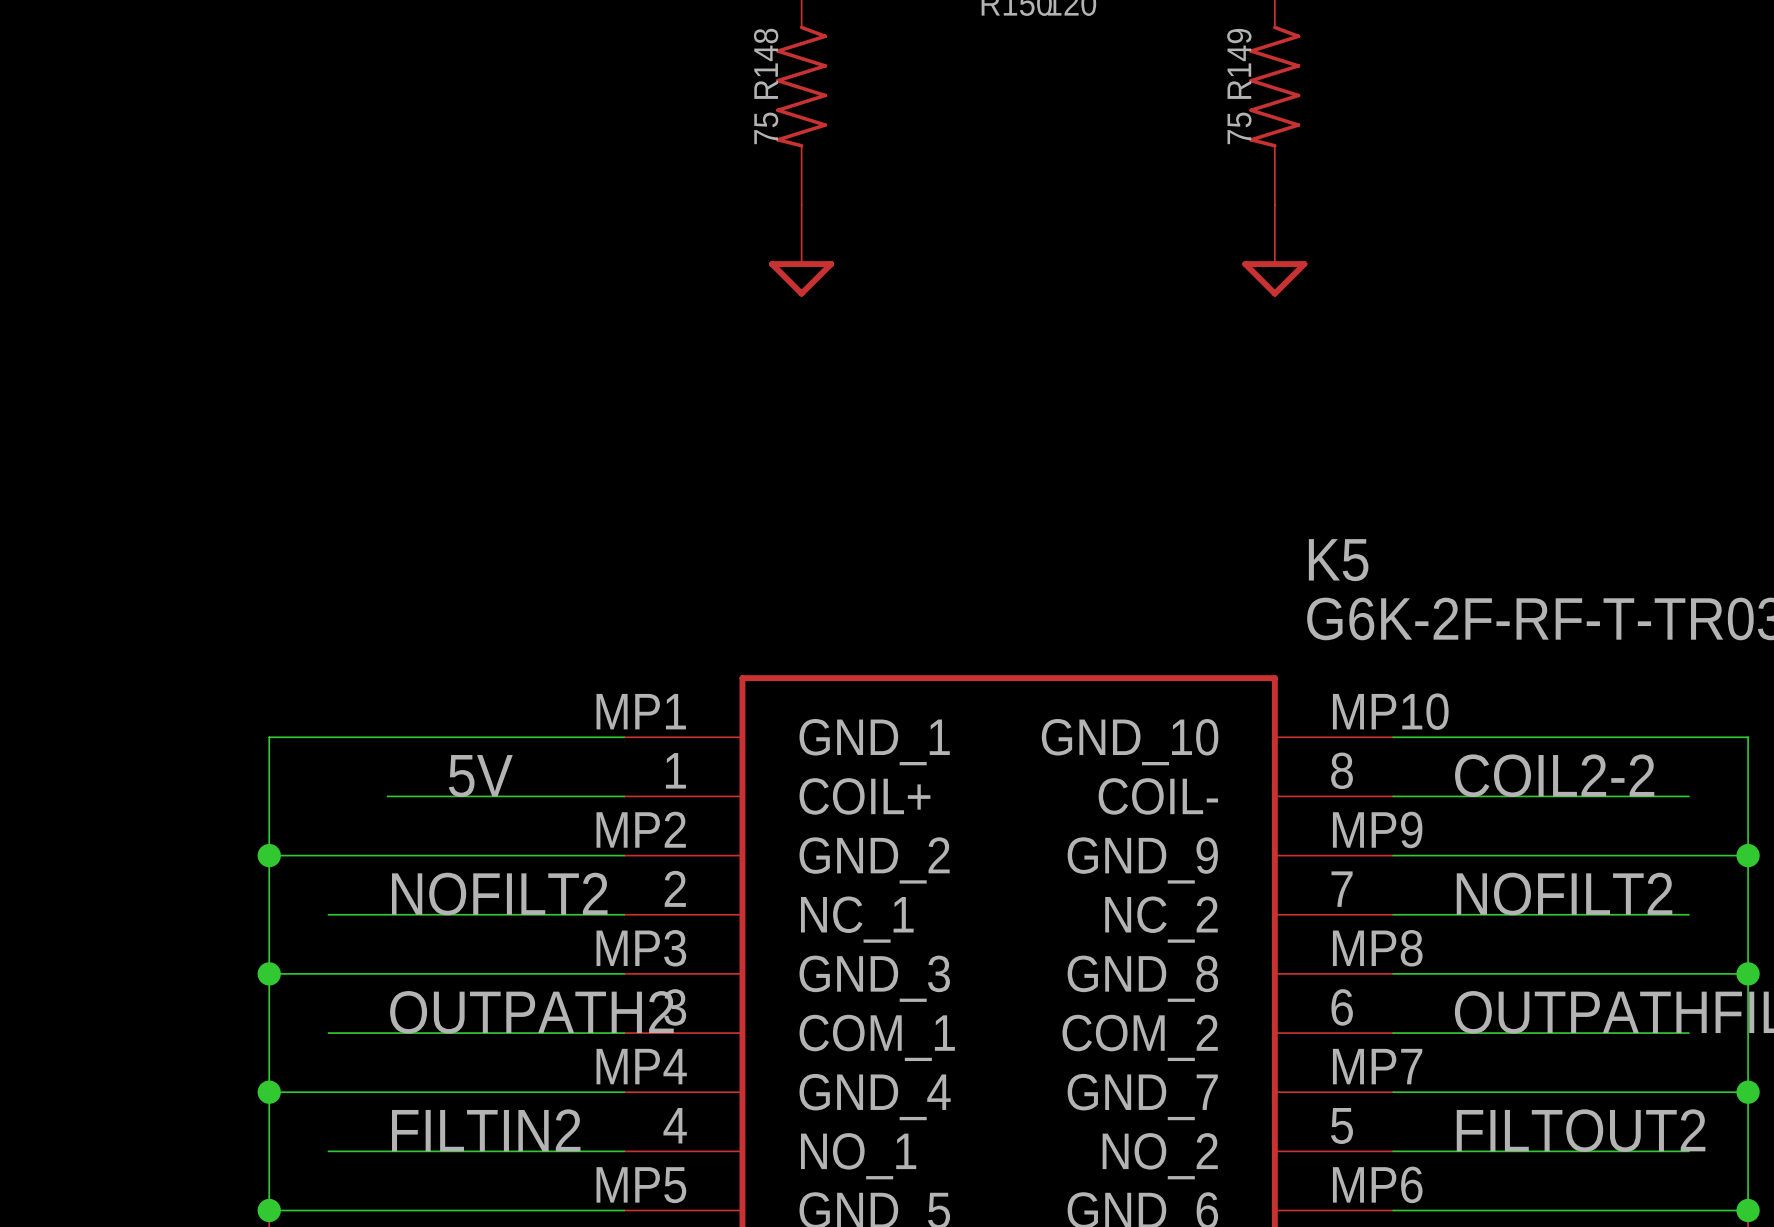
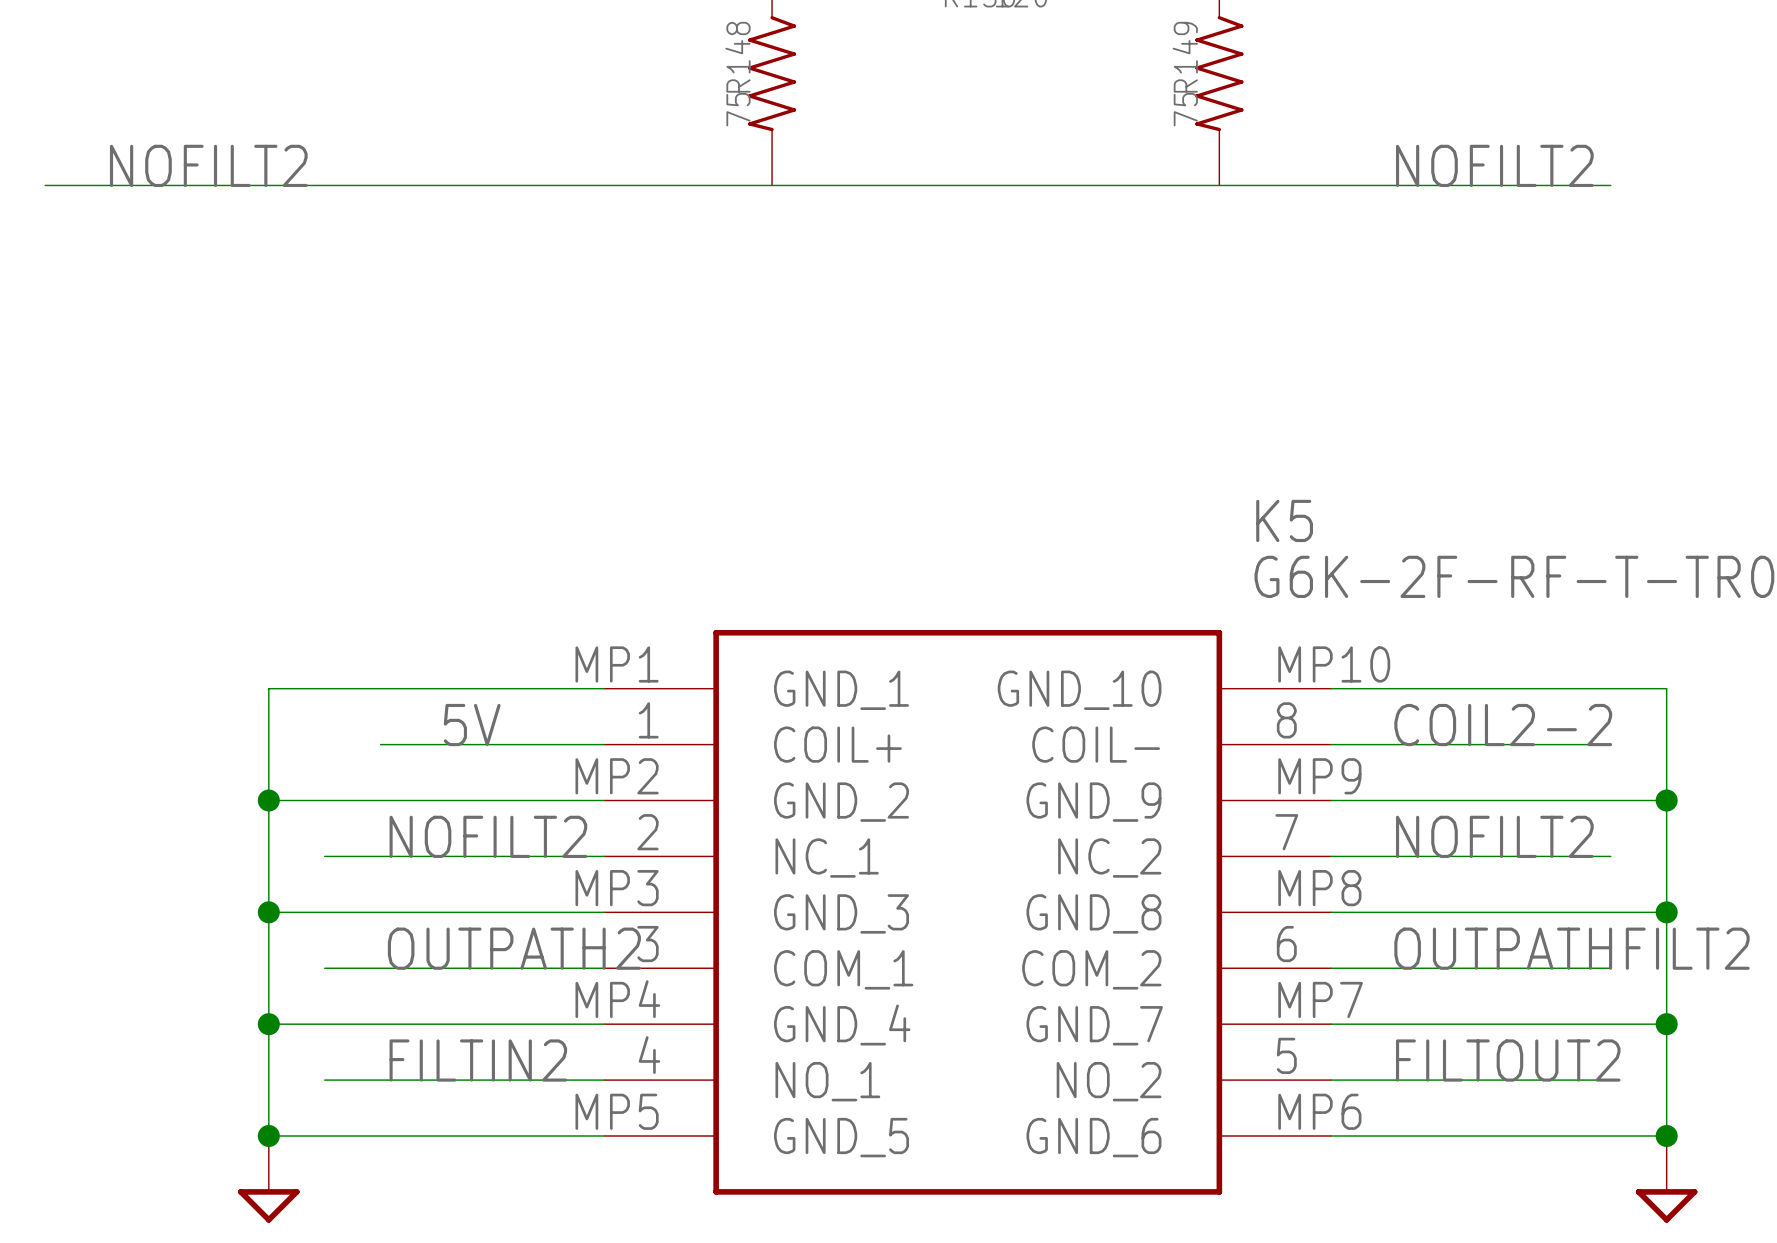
label: none -> NOFILT2 (208, 165)
label: none -> NOFILT2 (1494, 165)
wire: none -> (45, 185) (1610, 185)
power symbol: (801, 250) -> none
power symbol: (1274, 250) -> none

